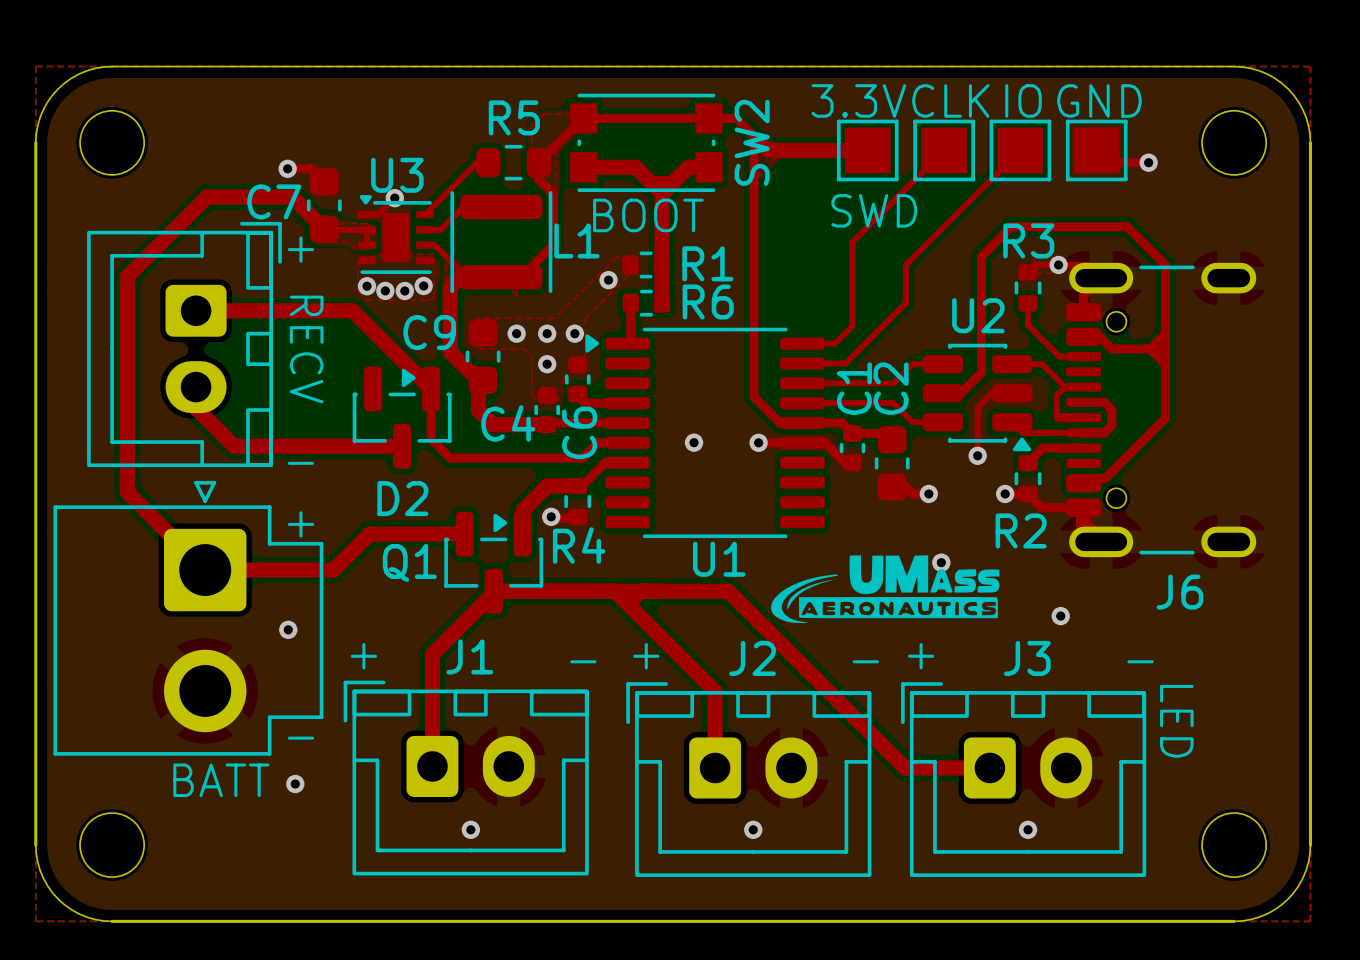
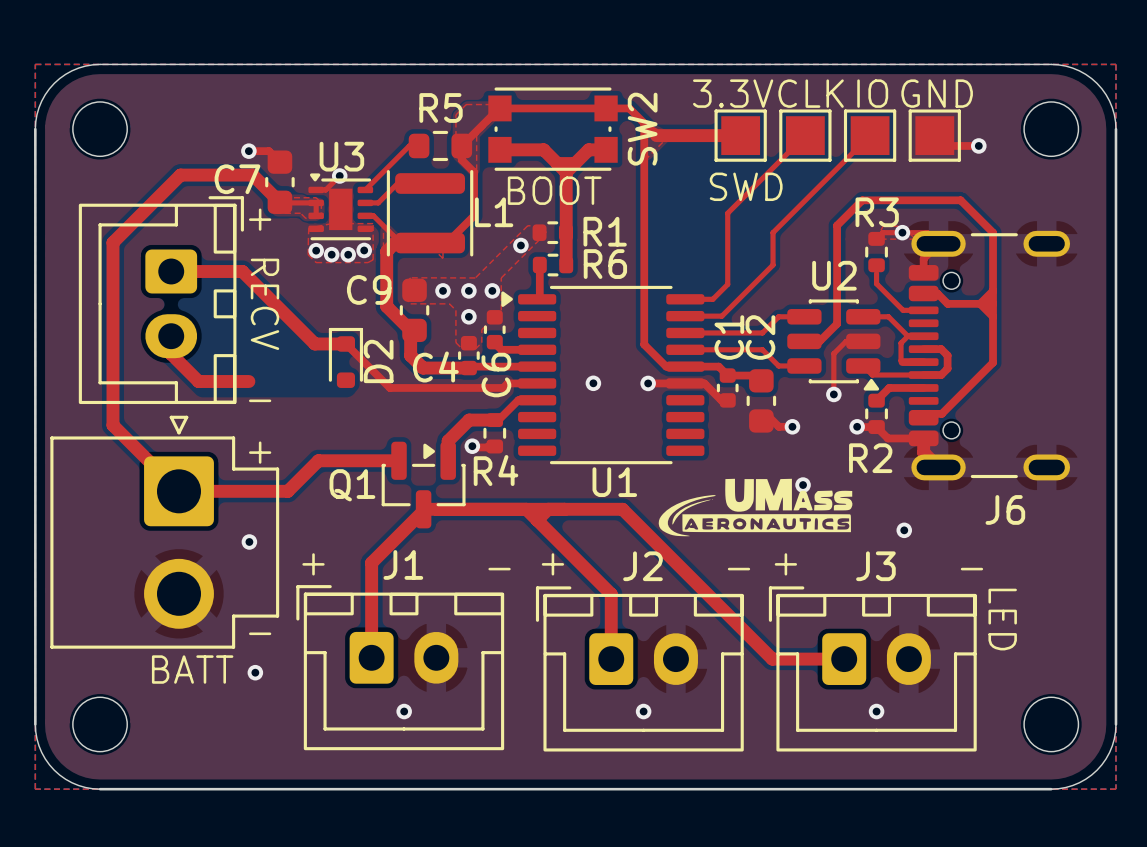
top track: (280, 310) (352, 310) (431, 389) (431, 439) (450, 458) (582, 458) (597, 442) -> (242, 271) (314, 343) (345, 343) (389, 387) (503, 387) (507, 383) (511, 383)
D2 footprint: [352, 366, 452, 469] -> [328, 327, 364, 388]
top track: (228, 440) (234, 446) (402, 446) -> (198, 381) (248, 381)
D2 name position: D2 (402, 498) -> D2 (378, 361)

